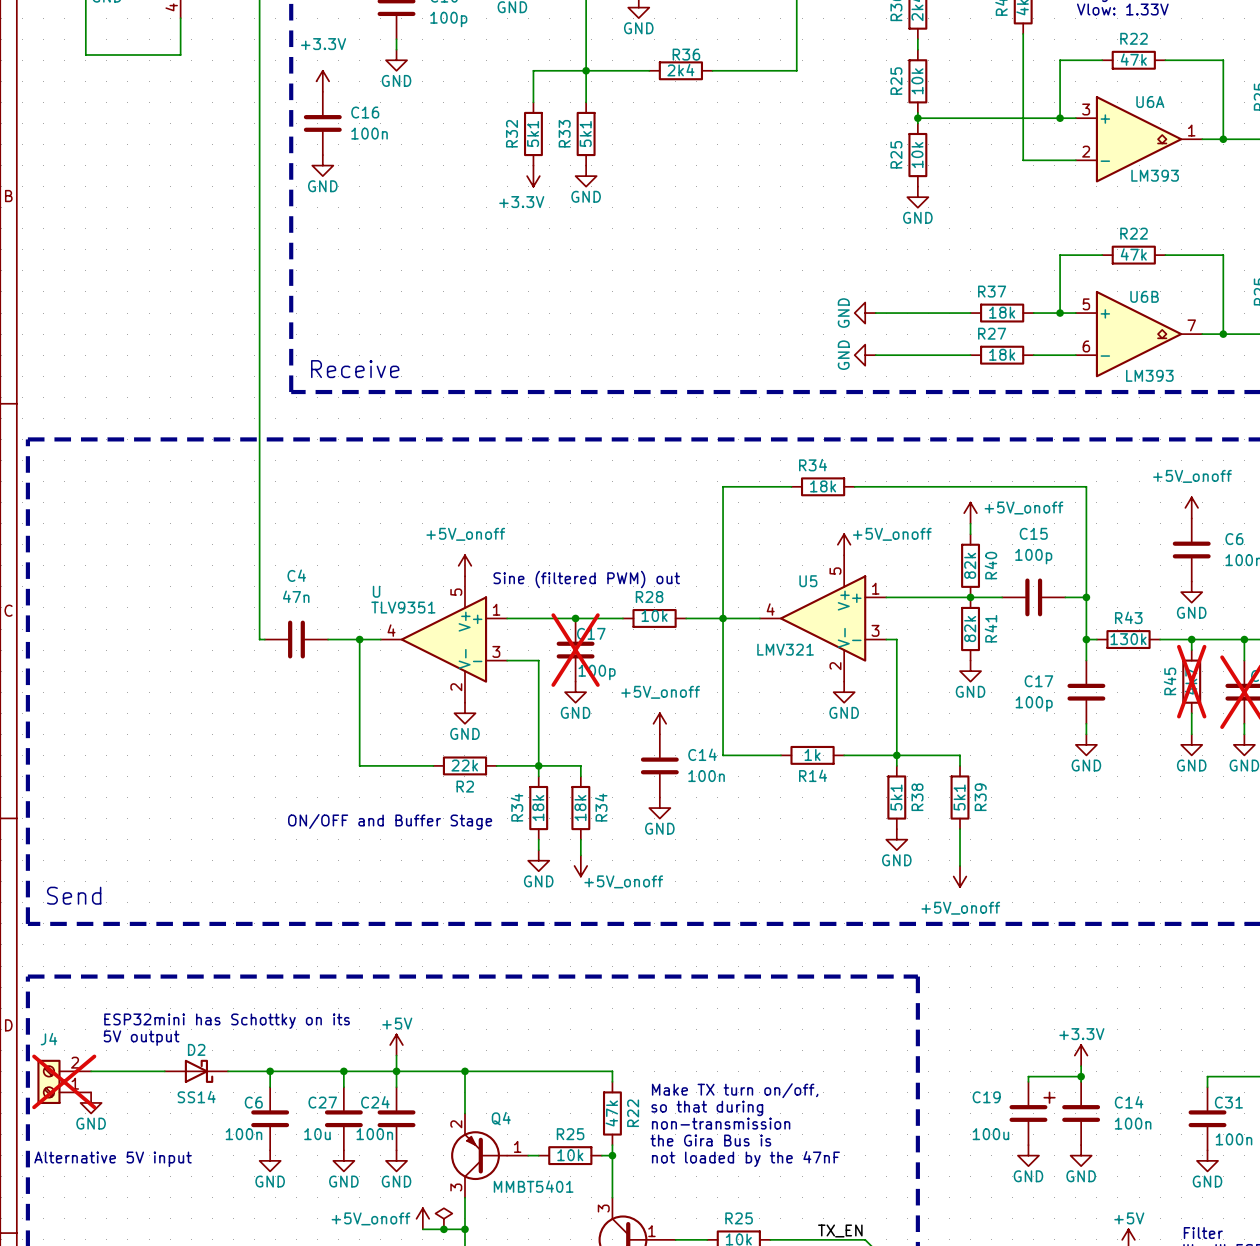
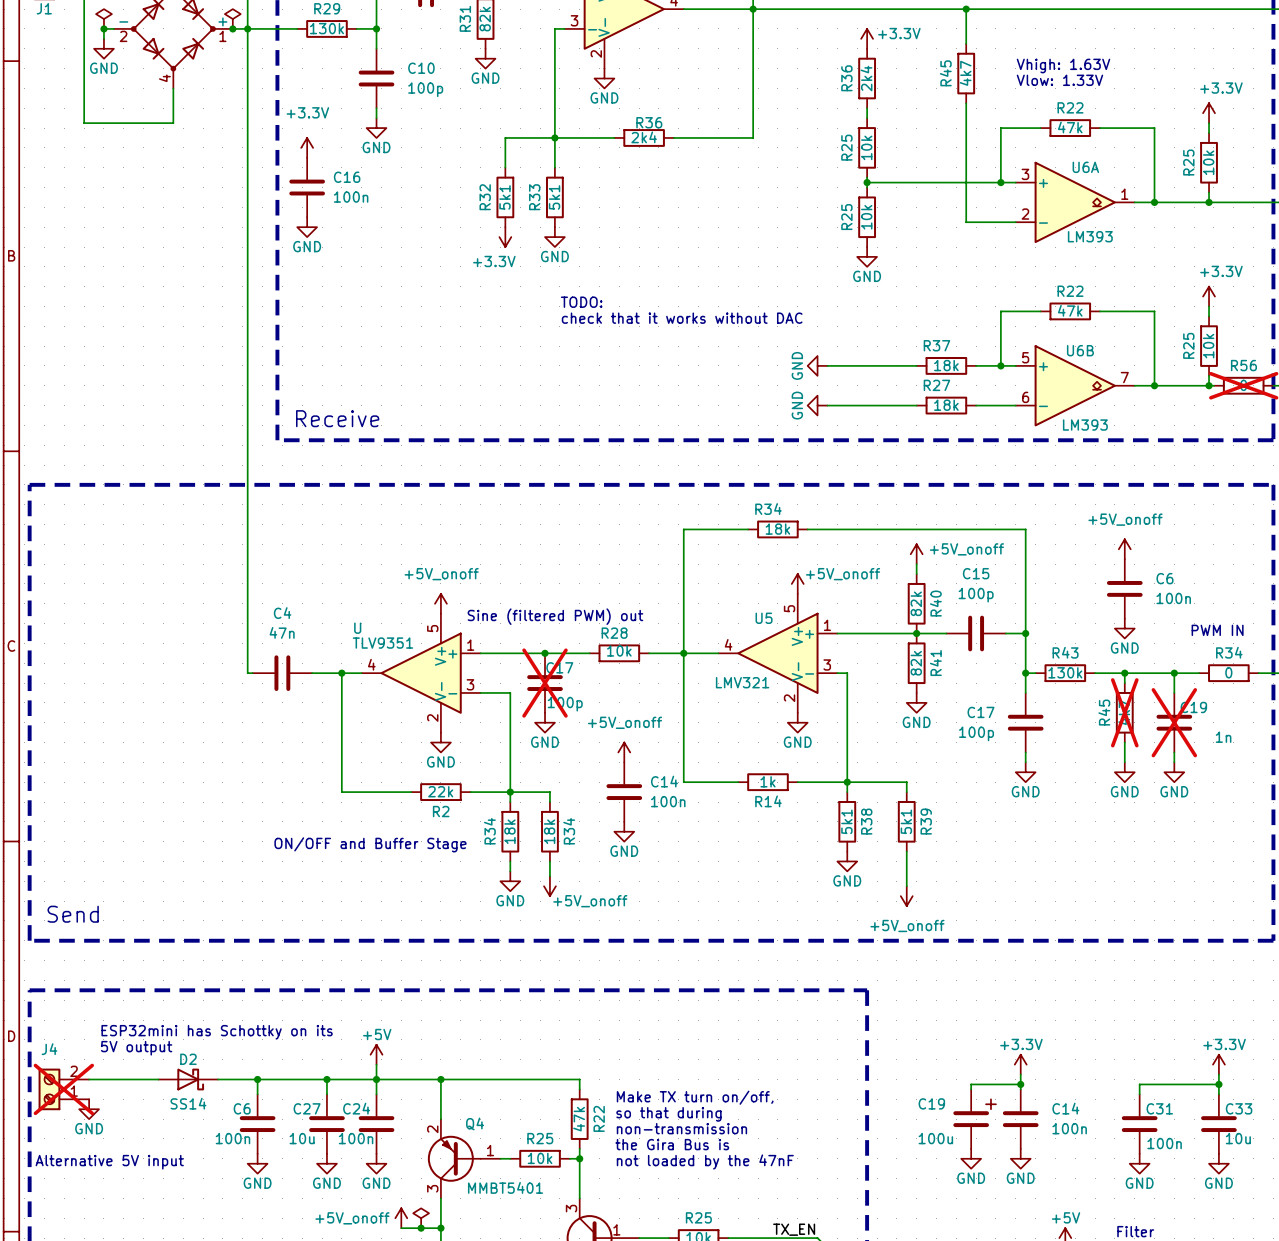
text: none -> TODO: (581, 302)
text: none -> check that it works without DAC (682, 318)

